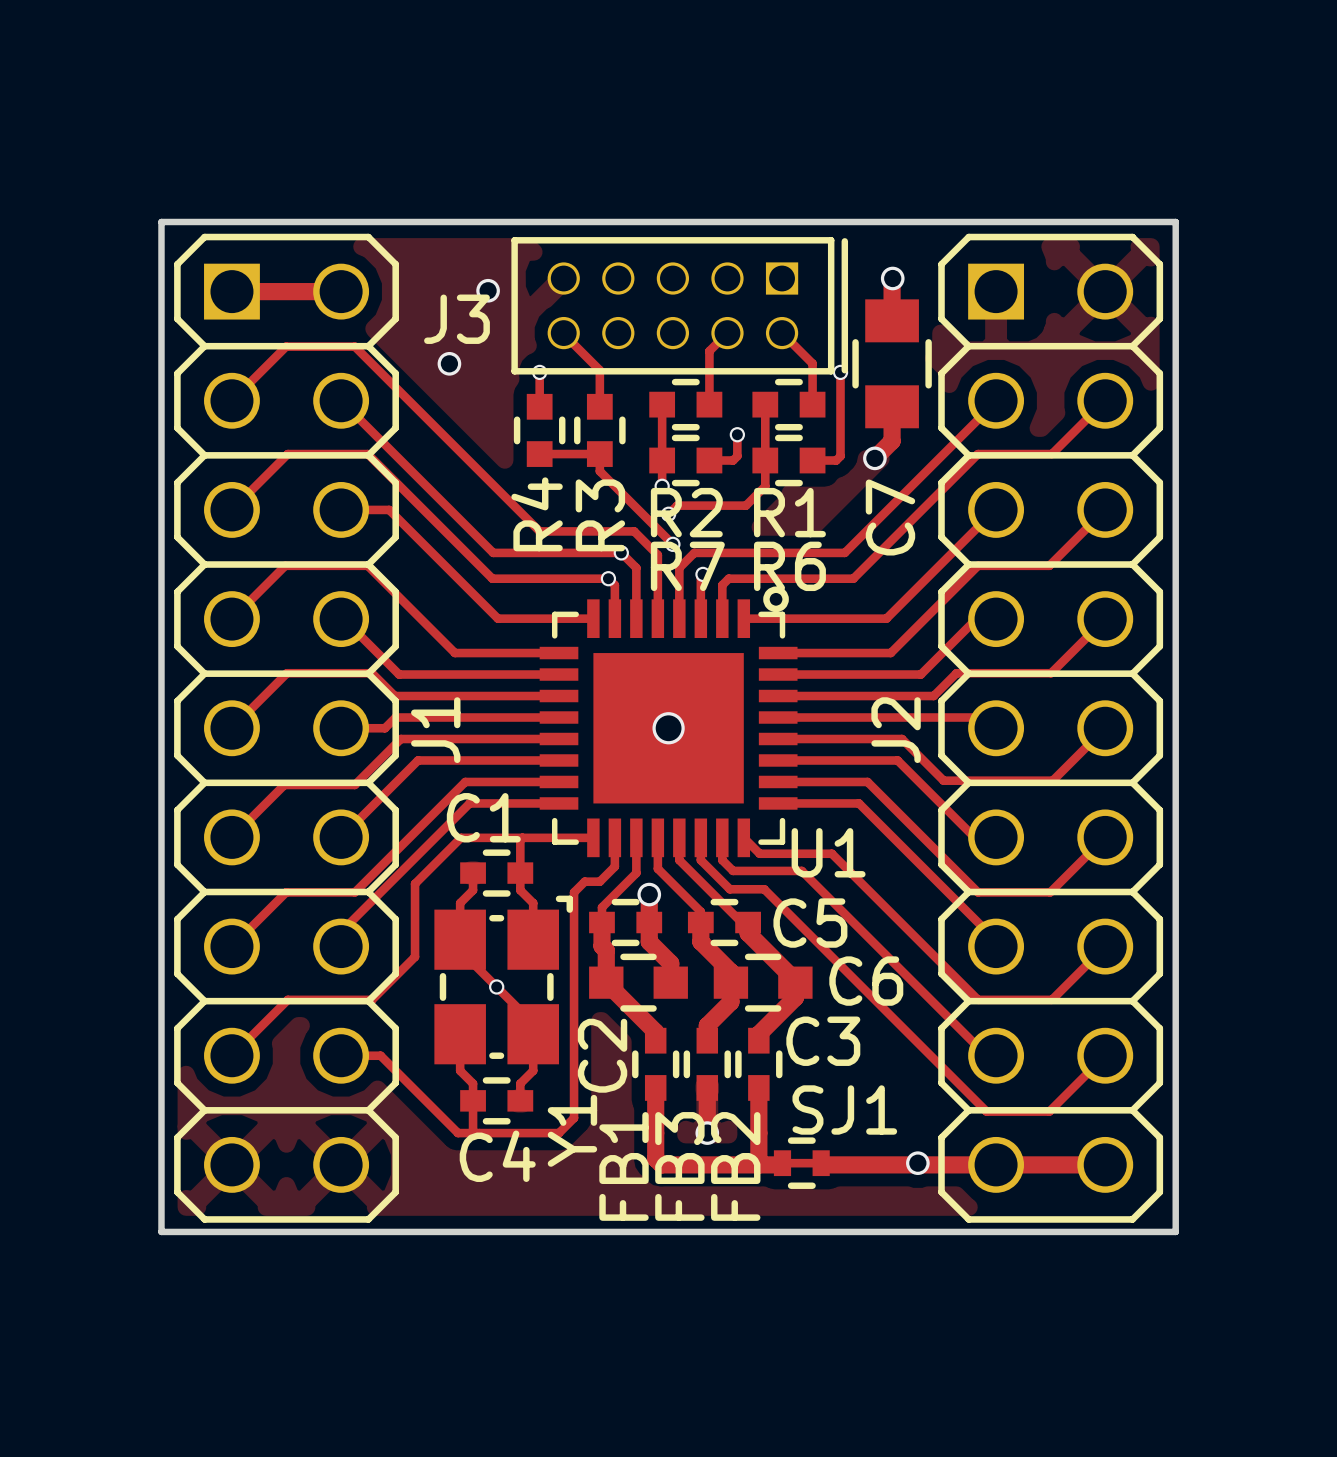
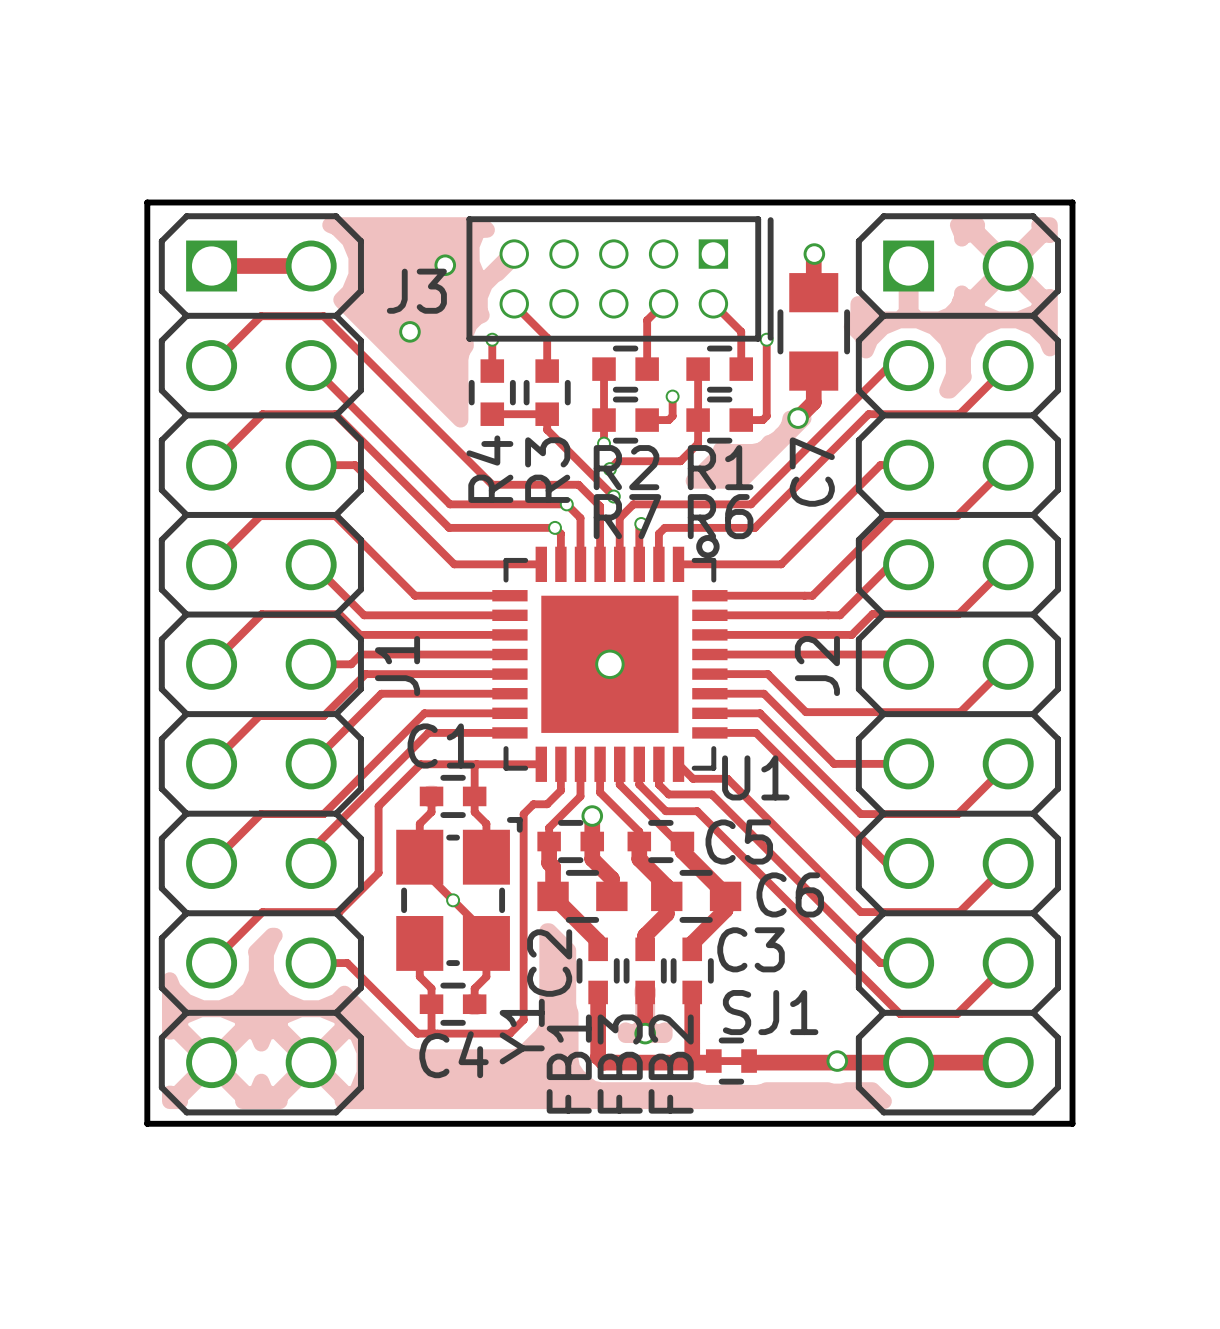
track: (996, 401) (844, 552) (823, 552) -> (908, 365) (889, 365) (751, 504)
track: (978, 454) (853, 578) (827, 578) -> (892, 414) (868, 414) (754, 527)
track: (995, 509) (886, 618) (856, 618) -> (907, 465) (880, 465) (781, 564)
track: (841, 738) (901, 738) (943, 780) -> (767, 674) (805, 712) (860, 712)
track: (837, 760) (897, 760) (974, 837) -> (763, 693) (834, 763) (889, 763)
track: (833, 781) (867, 781) (978, 892) -> (760, 713) (860, 814) (892, 814)
track: (828, 803) (858, 803) (996, 940) (996, 946) -> (756, 732) (886, 863) (908, 863)
track: (797, 853) (831, 853) (978, 999) -> (727, 778) (860, 912) (892, 912)
track: (780, 870) (801, 870) (986, 1055) -> (711, 794) (880, 963) (900, 963)

